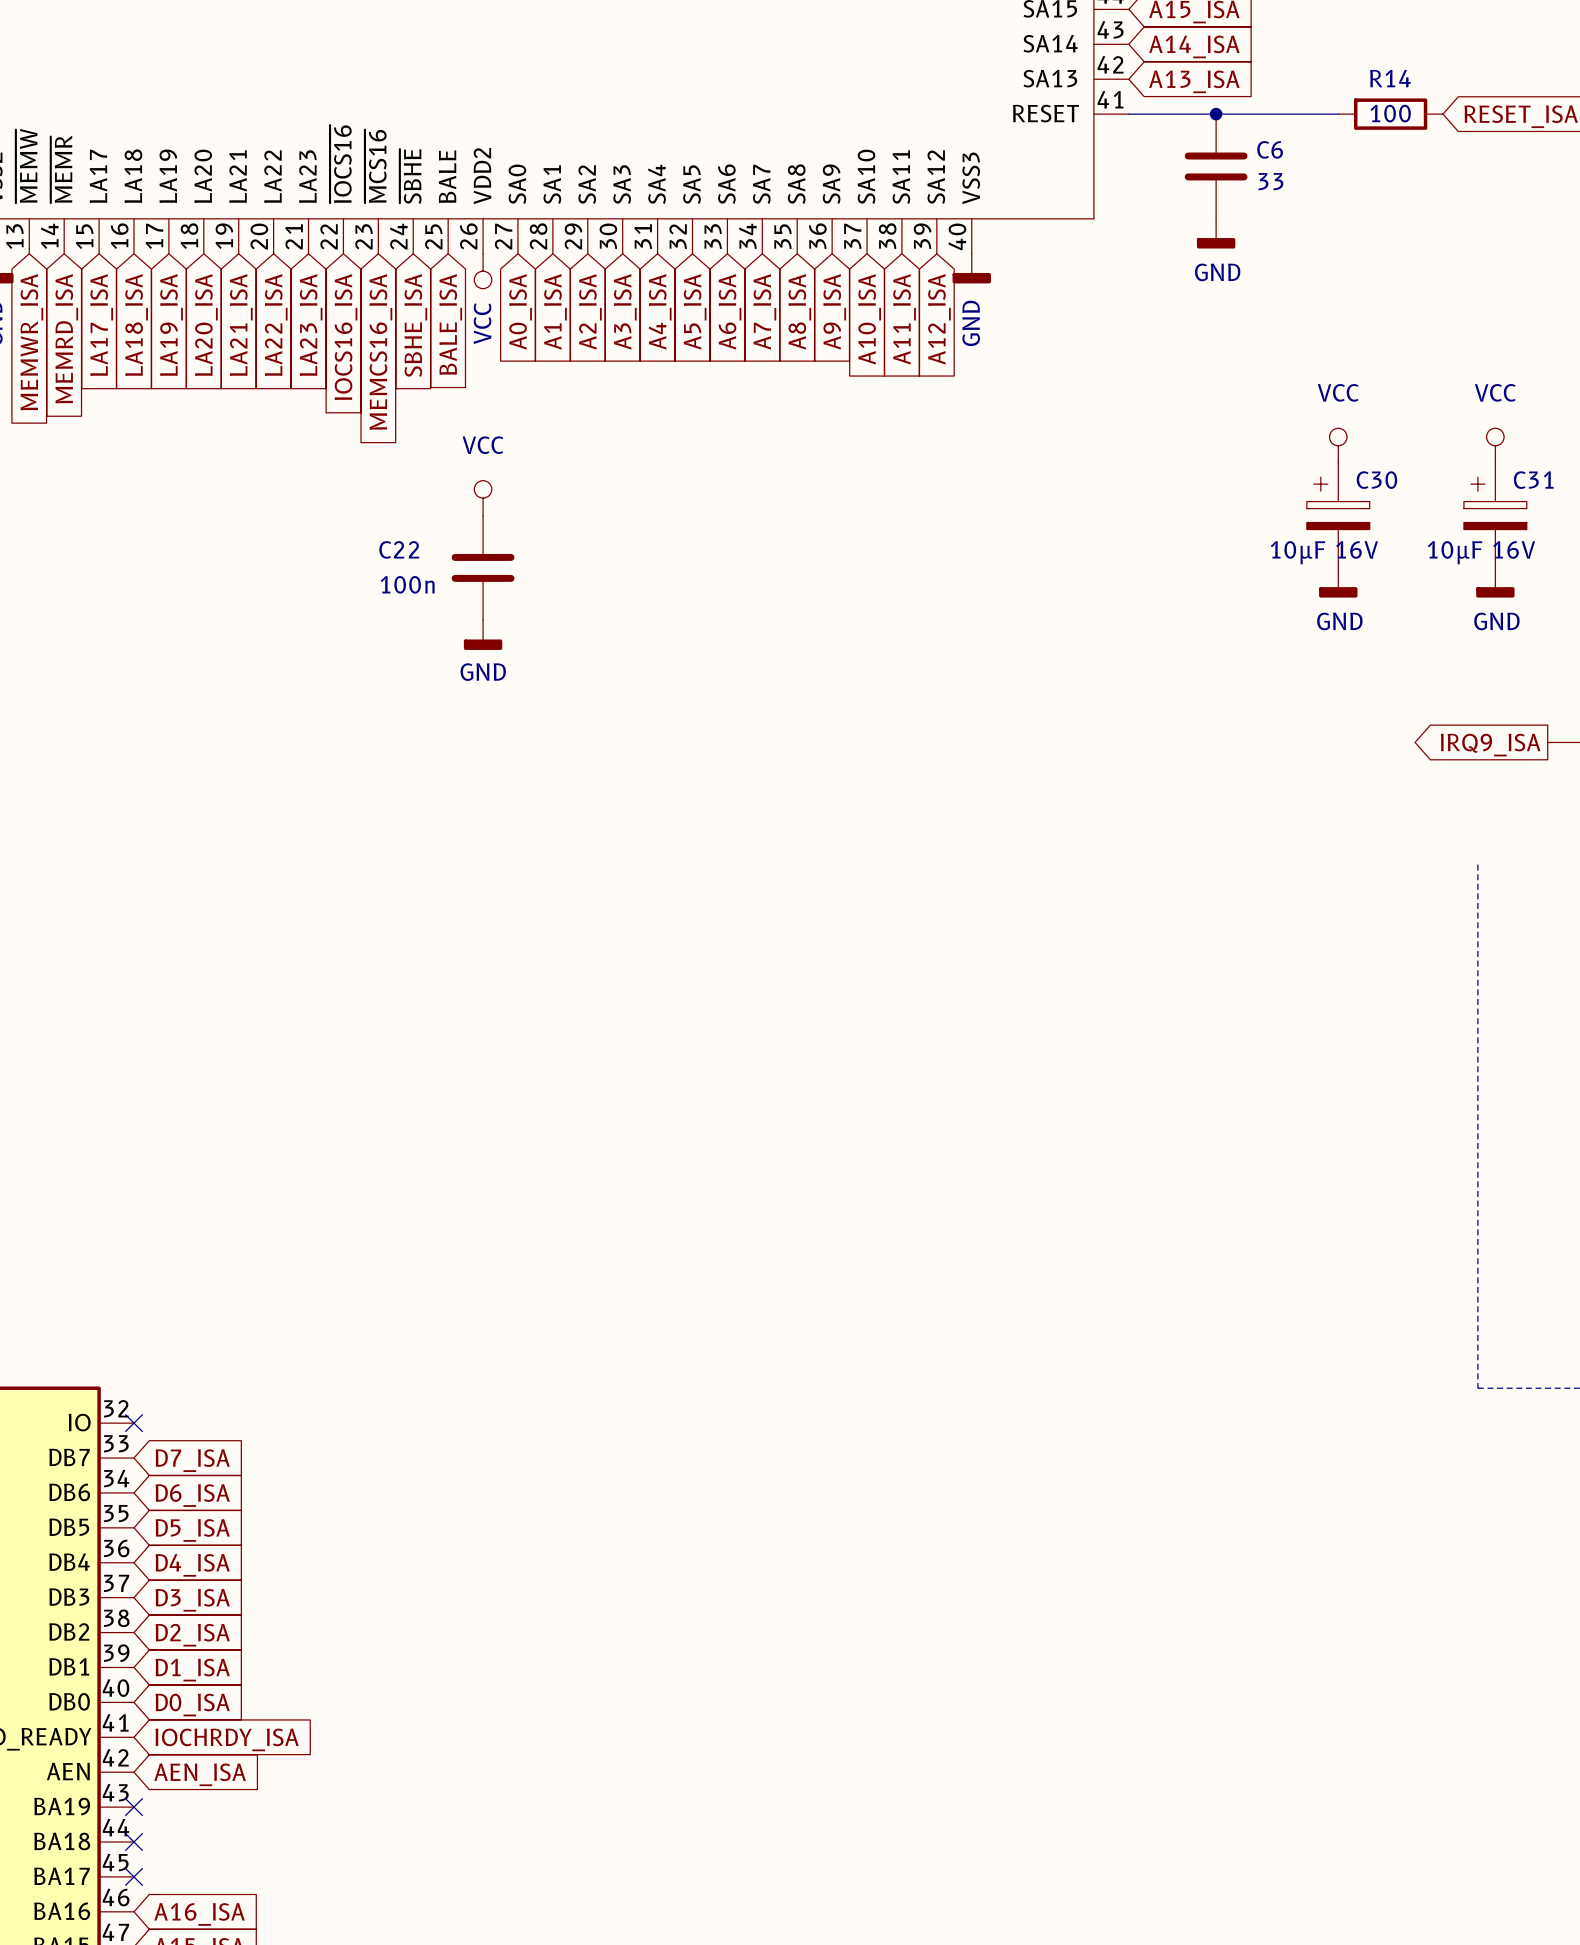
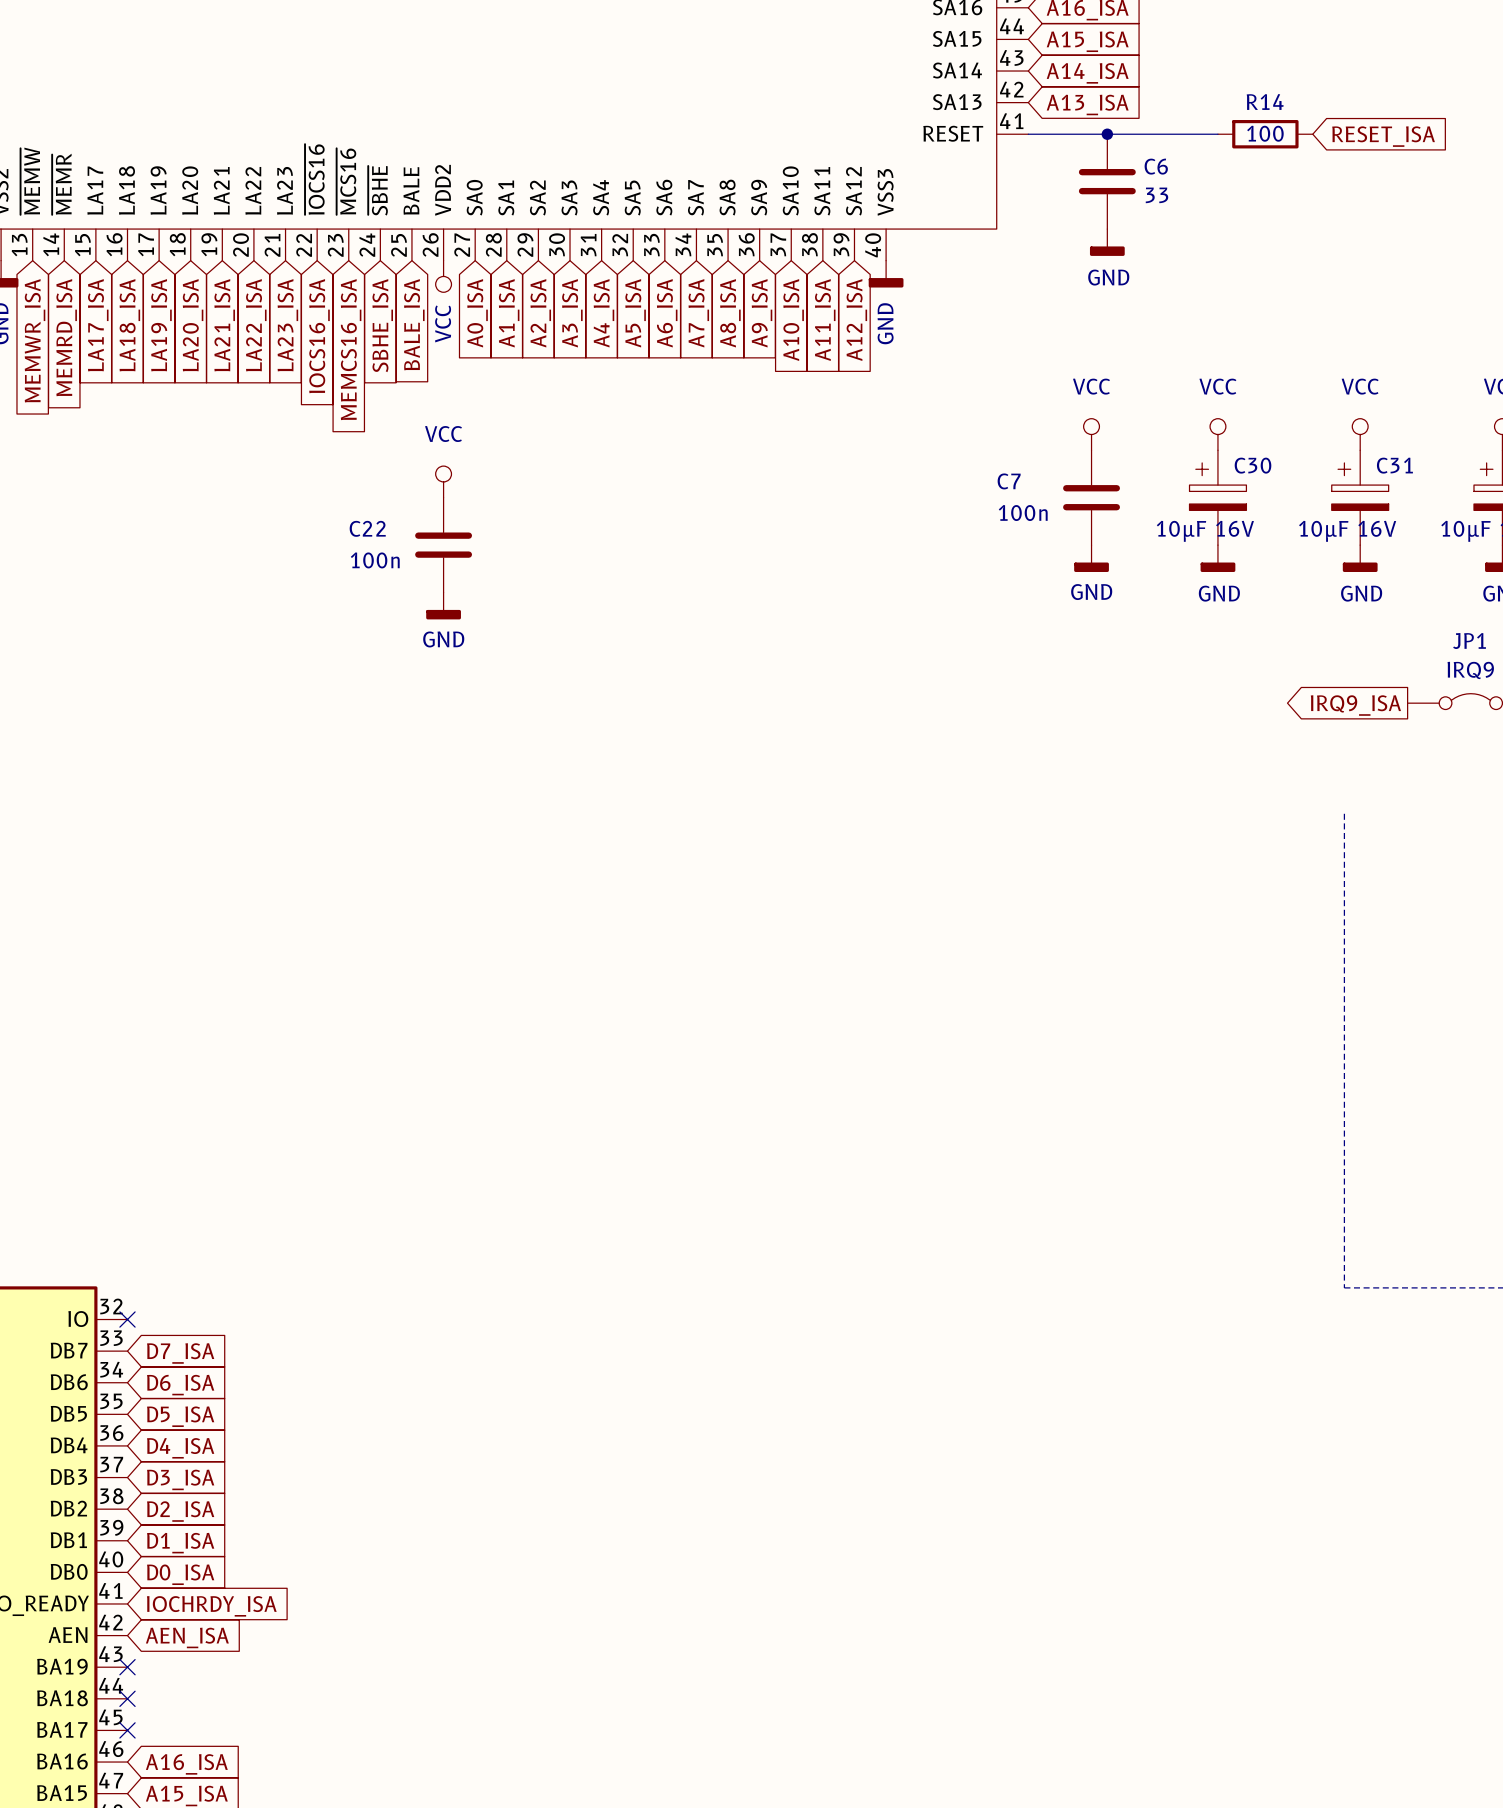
power symbol: none -> VCC (1091, 434)
C7: none -> 100n (1091, 497)
power symbol: none -> GND (1091, 558)

